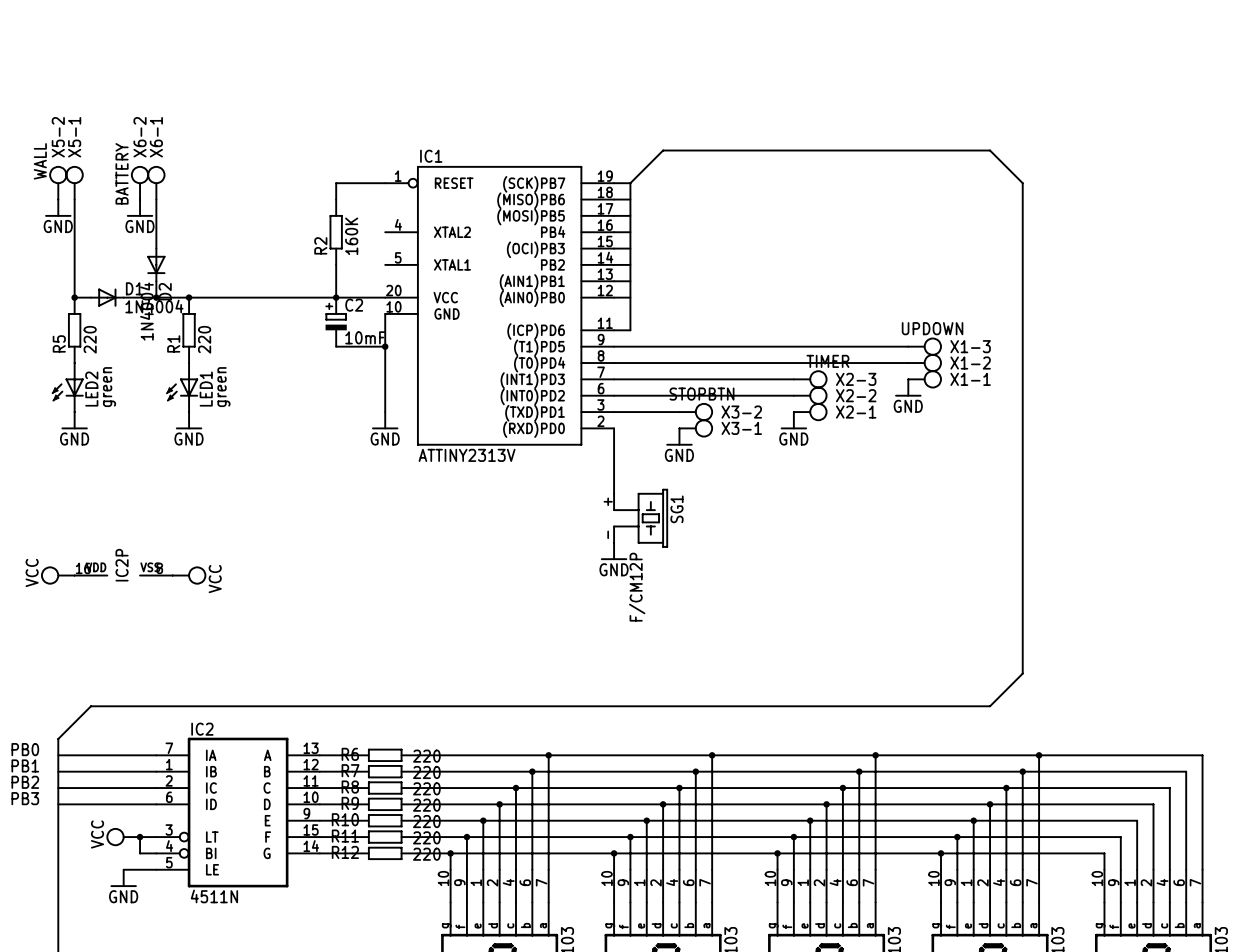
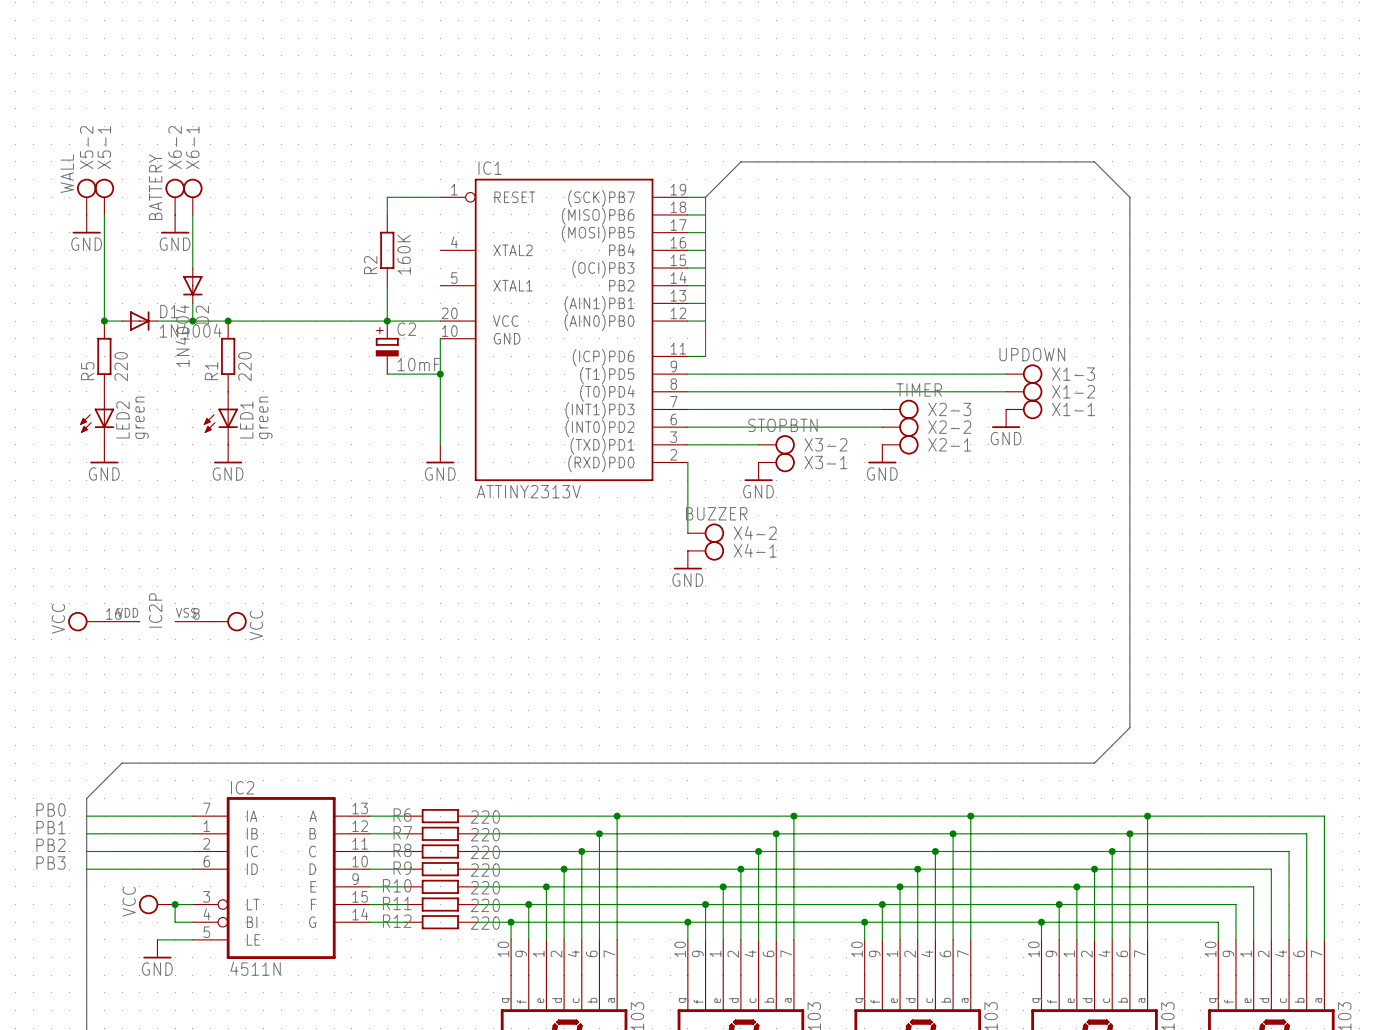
X4-2: none -> BUZZER (705, 533)
X4-1: none -> (705, 550)
SG1: F/CM12P (640, 518) -> none
power symbol position: GND (614, 551) -> GND (687, 560)

